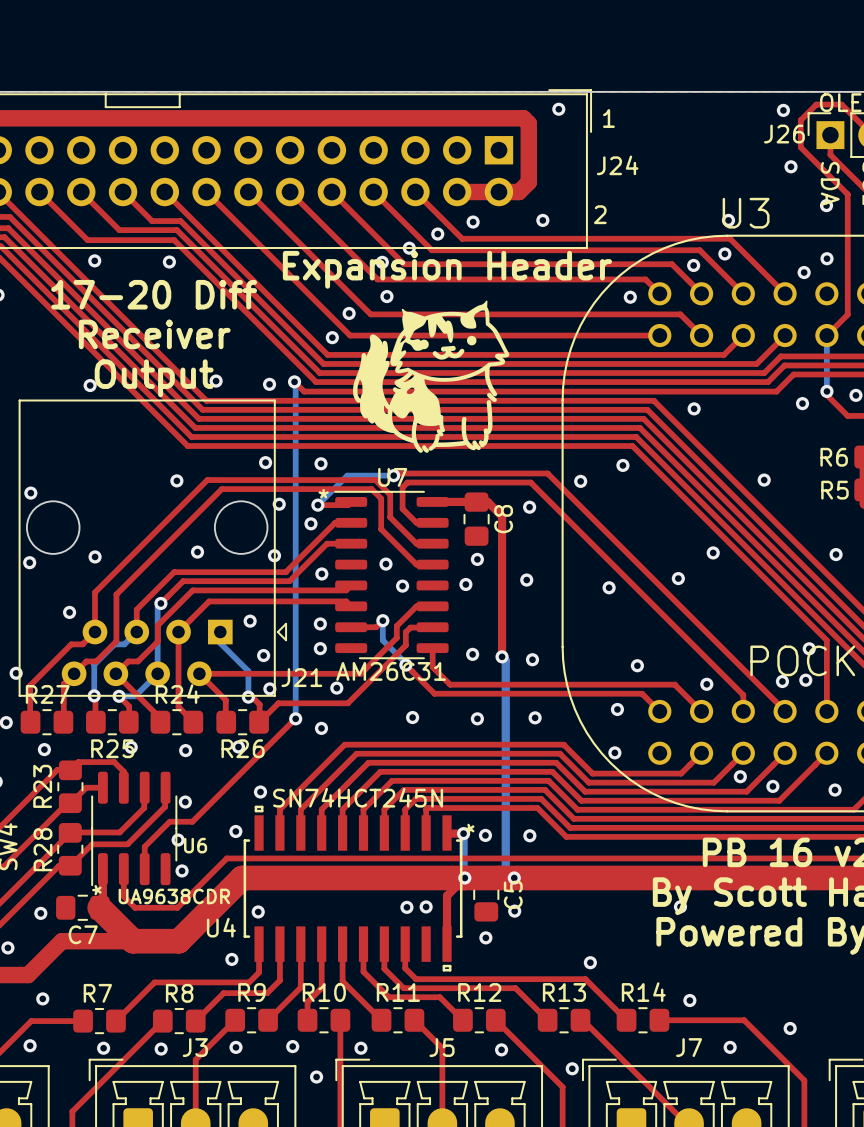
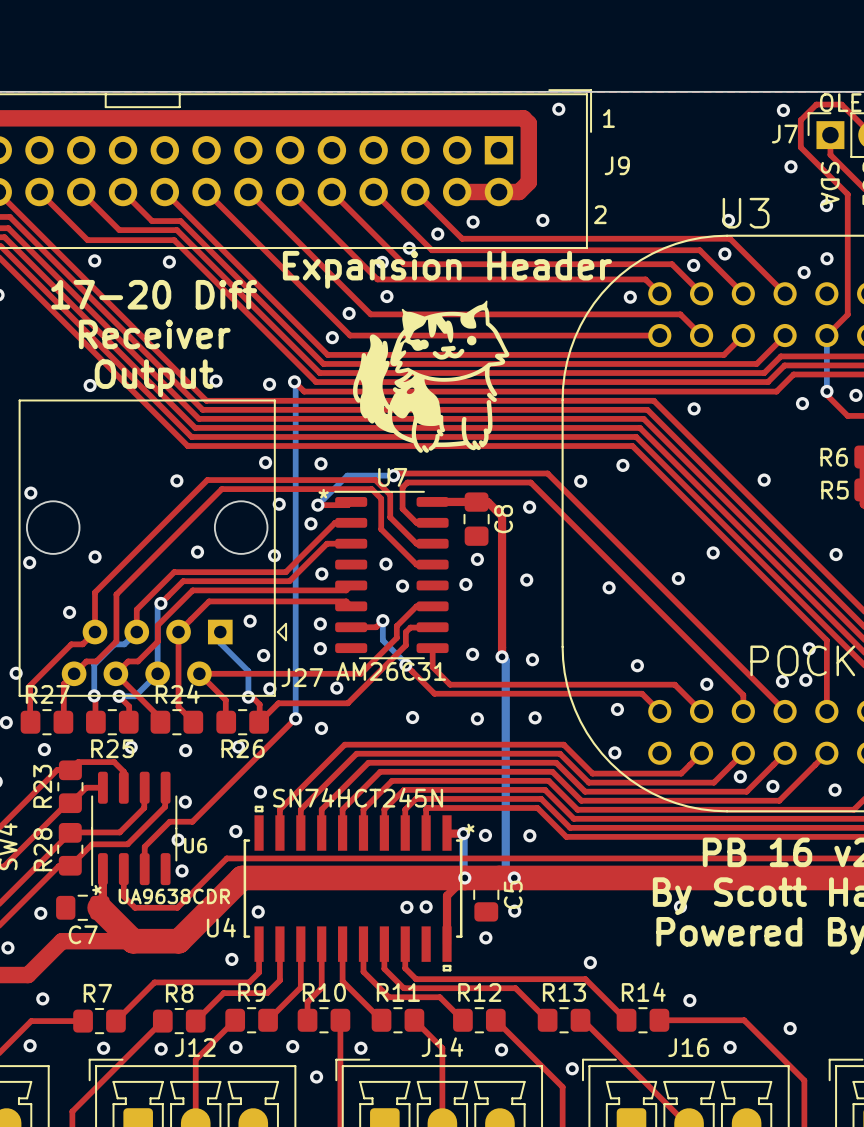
J26 name: J26 (784, 134) -> J7 (784, 134)
J24 name: J24 (617, 165) -> J9 (617, 165)
J21 name: J21 (301, 677) -> J27 (302, 677)
J3 name: J3 (195, 1047) -> J12 (195, 1047)
J5 name: J5 (442, 1047) -> J14 (442, 1047)
J7 name: J7 (689, 1047) -> J16 (688, 1047)

